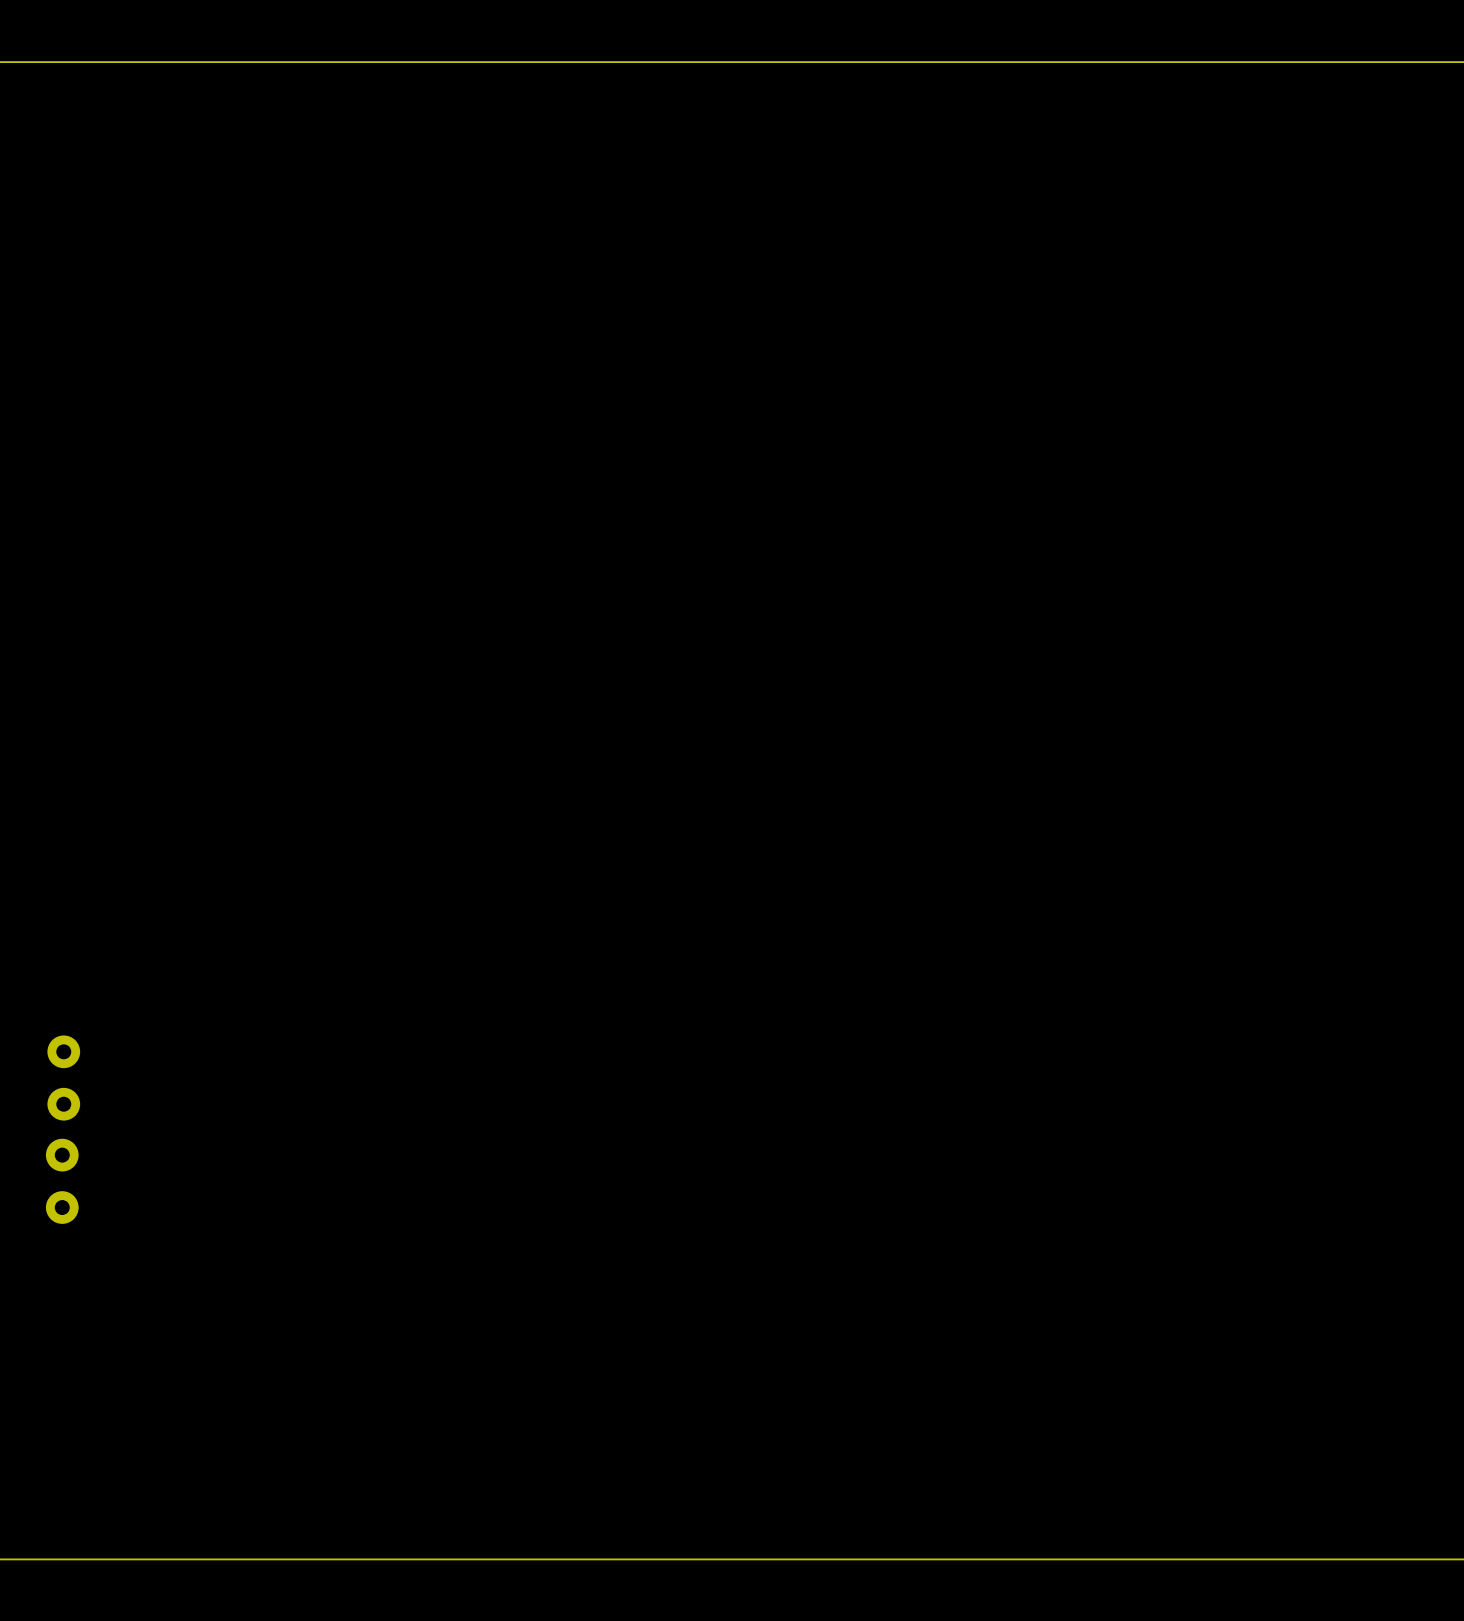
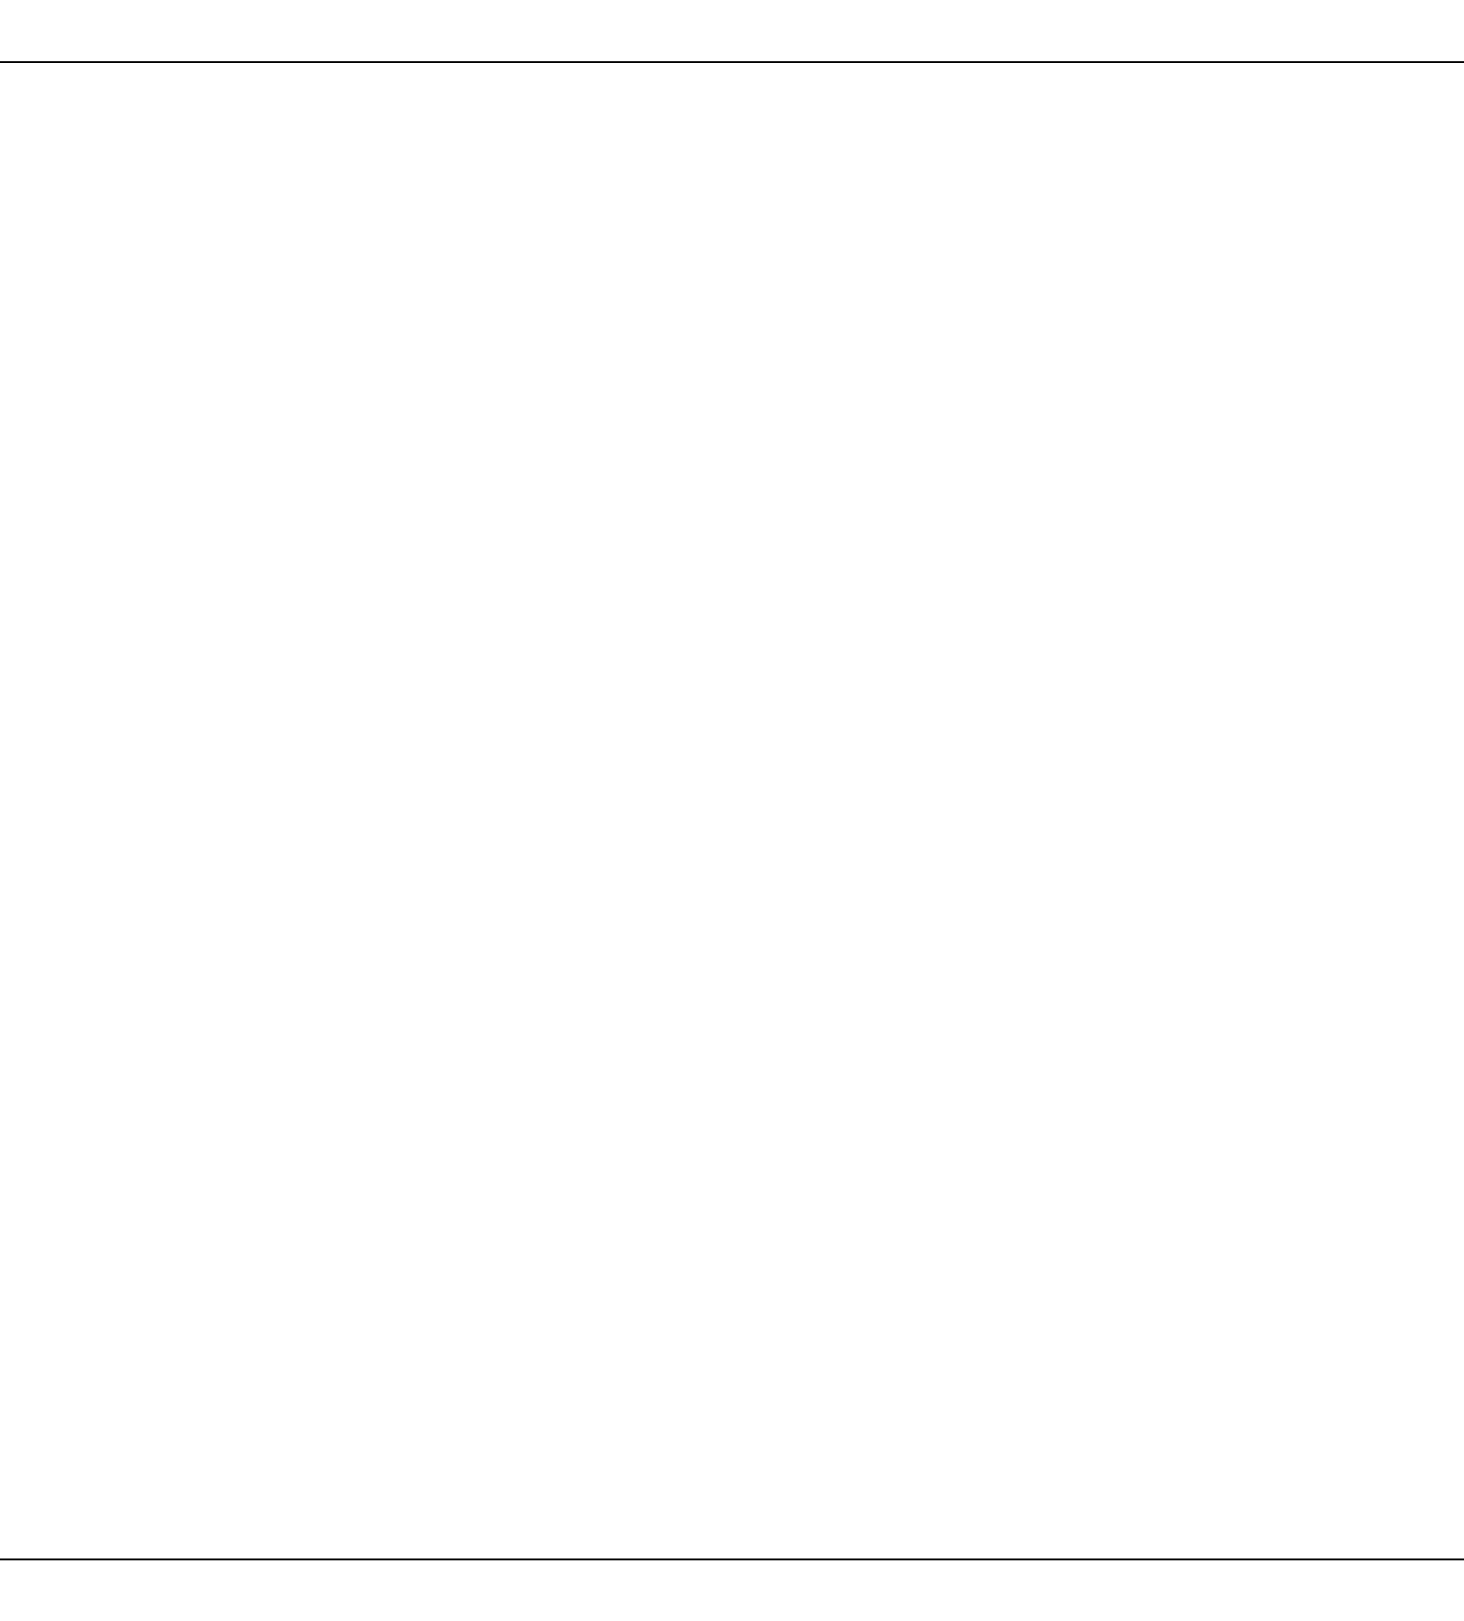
part: (63, 1078) -> none
part: (62, 1181) -> none

